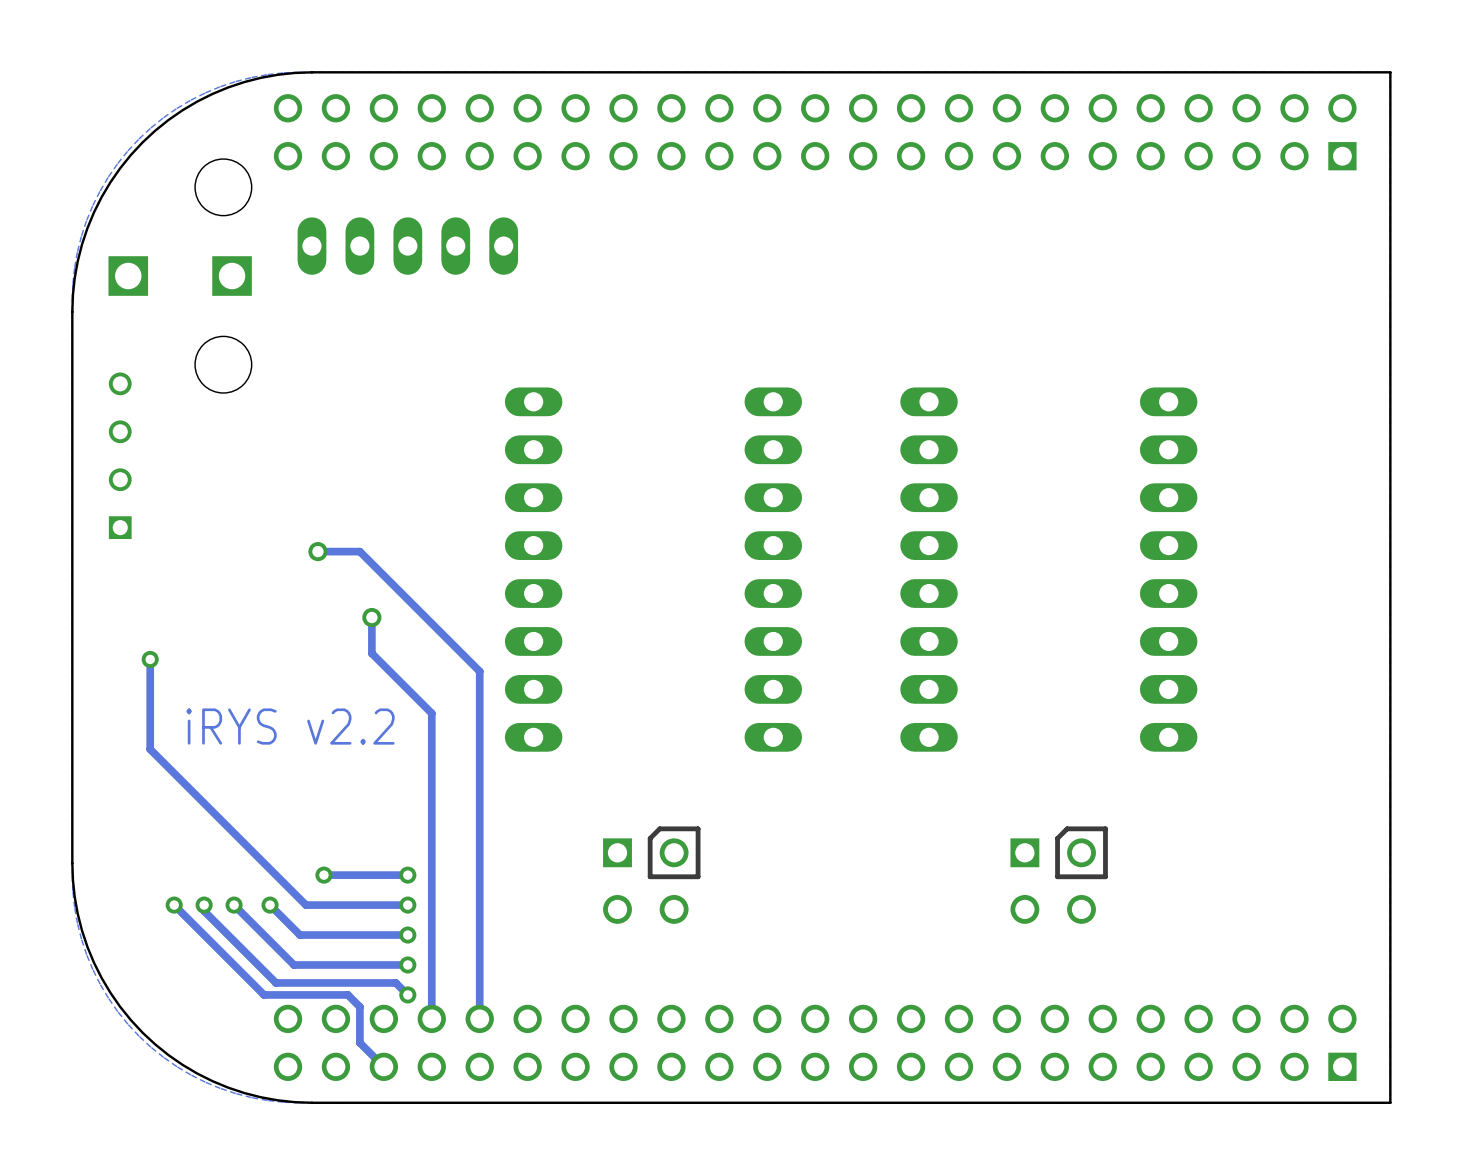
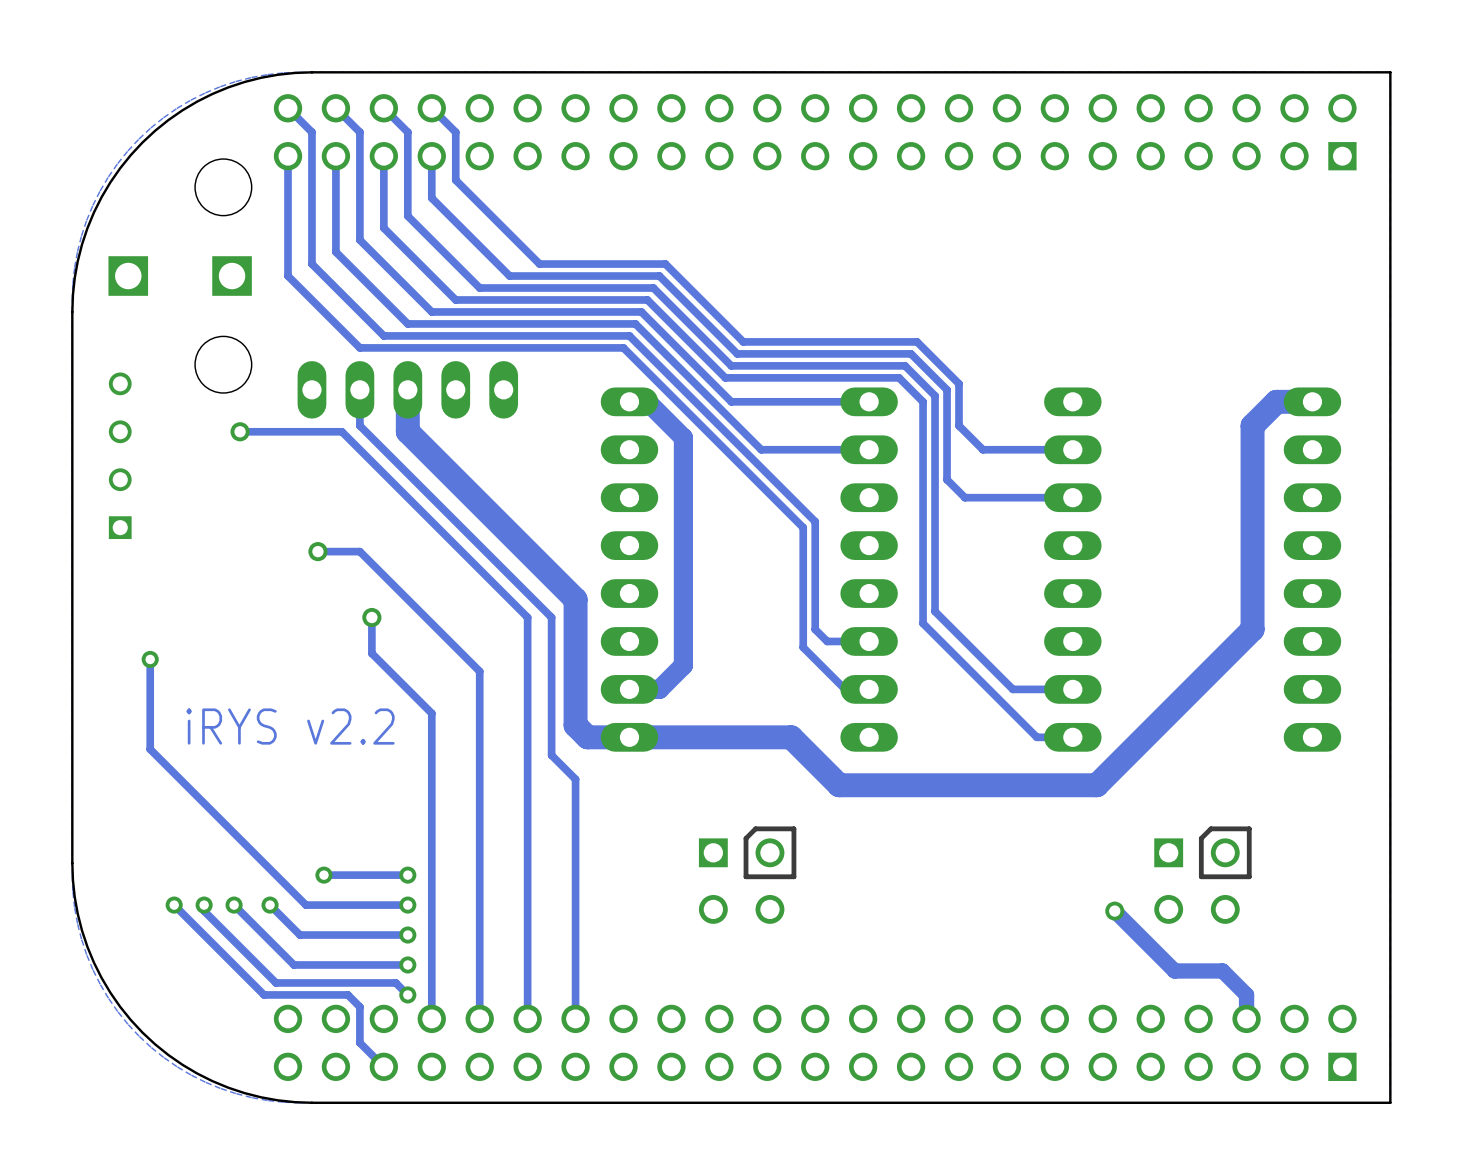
track: none -> (288, 108) (311, 132) (311, 264) (383, 335) (629, 335) (815, 521) (815, 629) (827, 641) (869, 641)
track: none -> (335, 108) (359, 132) (359, 240) (431, 311) (641, 311) (731, 401) (869, 401)
track: none -> (383, 108) (407, 132) (407, 216) (479, 288) (653, 288) (731, 365) (905, 365) (935, 395) (935, 611) (1012, 689) (1072, 689)
track: none -> (431, 108) (455, 132) (455, 180) (539, 264) (665, 264) (743, 341) (917, 341) (958, 383) (958, 425) (982, 449) (1072, 449)
track: none -> (288, 156) (288, 276) (359, 347) (623, 347) (803, 527) (803, 647) (845, 689) (869, 689)
track: none -> (335, 156) (335, 252) (407, 323) (635, 323) (761, 449) (869, 449)
track: none -> (383, 156) (383, 228) (455, 299) (647, 299) (725, 377) (899, 377) (923, 401) (923, 623) (1036, 737) (1072, 737)
track: none -> (431, 156) (431, 198) (509, 276) (659, 276) (737, 353) (911, 353) (947, 389) (947, 479) (964, 497) (1072, 497)
part position: (407, 246) -> (407, 389)
track: none -> (359, 389) (359, 425) (551, 617) (551, 755) (575, 779) (575, 1018)
track: none -> (407, 389) (407, 431) (575, 599) (575, 725) (587, 737) (791, 737) (839, 785) (1096, 785) (1252, 629) (1252, 425) (1276, 401) (1312, 401)
track: none -> (629, 401) (647, 401) (683, 437) (683, 665) (659, 689) (629, 689)
track: none -> (240, 431) (341, 431) (527, 617) (527, 1018)
via: none -> (240, 431)
part: (533, 569) -> none
part: none -> (629, 569)
part: (773, 569) -> none
part: none -> (869, 569)
part: (929, 569) -> none
part: none -> (1072, 569)
part: (1168, 569) -> none
part: none -> (1312, 569)
part position: (651, 875) -> (747, 875)
part position: (1059, 875) -> (1202, 875)
track: none -> (1114, 911) (1174, 970) (1222, 970) (1246, 994) (1246, 1018)
via: none -> (1114, 911)

